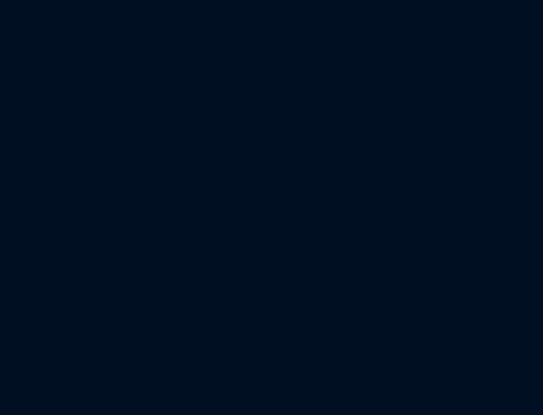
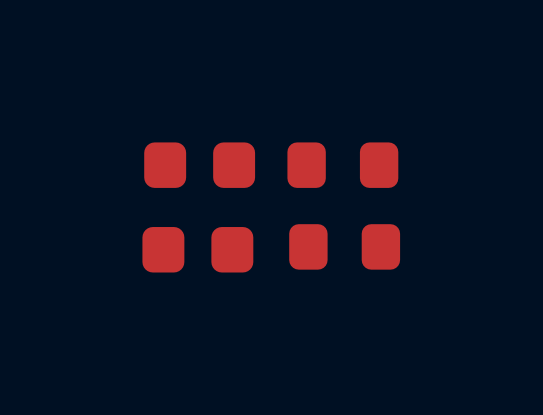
part: none -> (199, 165)
part: none -> (342, 165)
part: none -> (344, 246)
part: none -> (197, 249)

